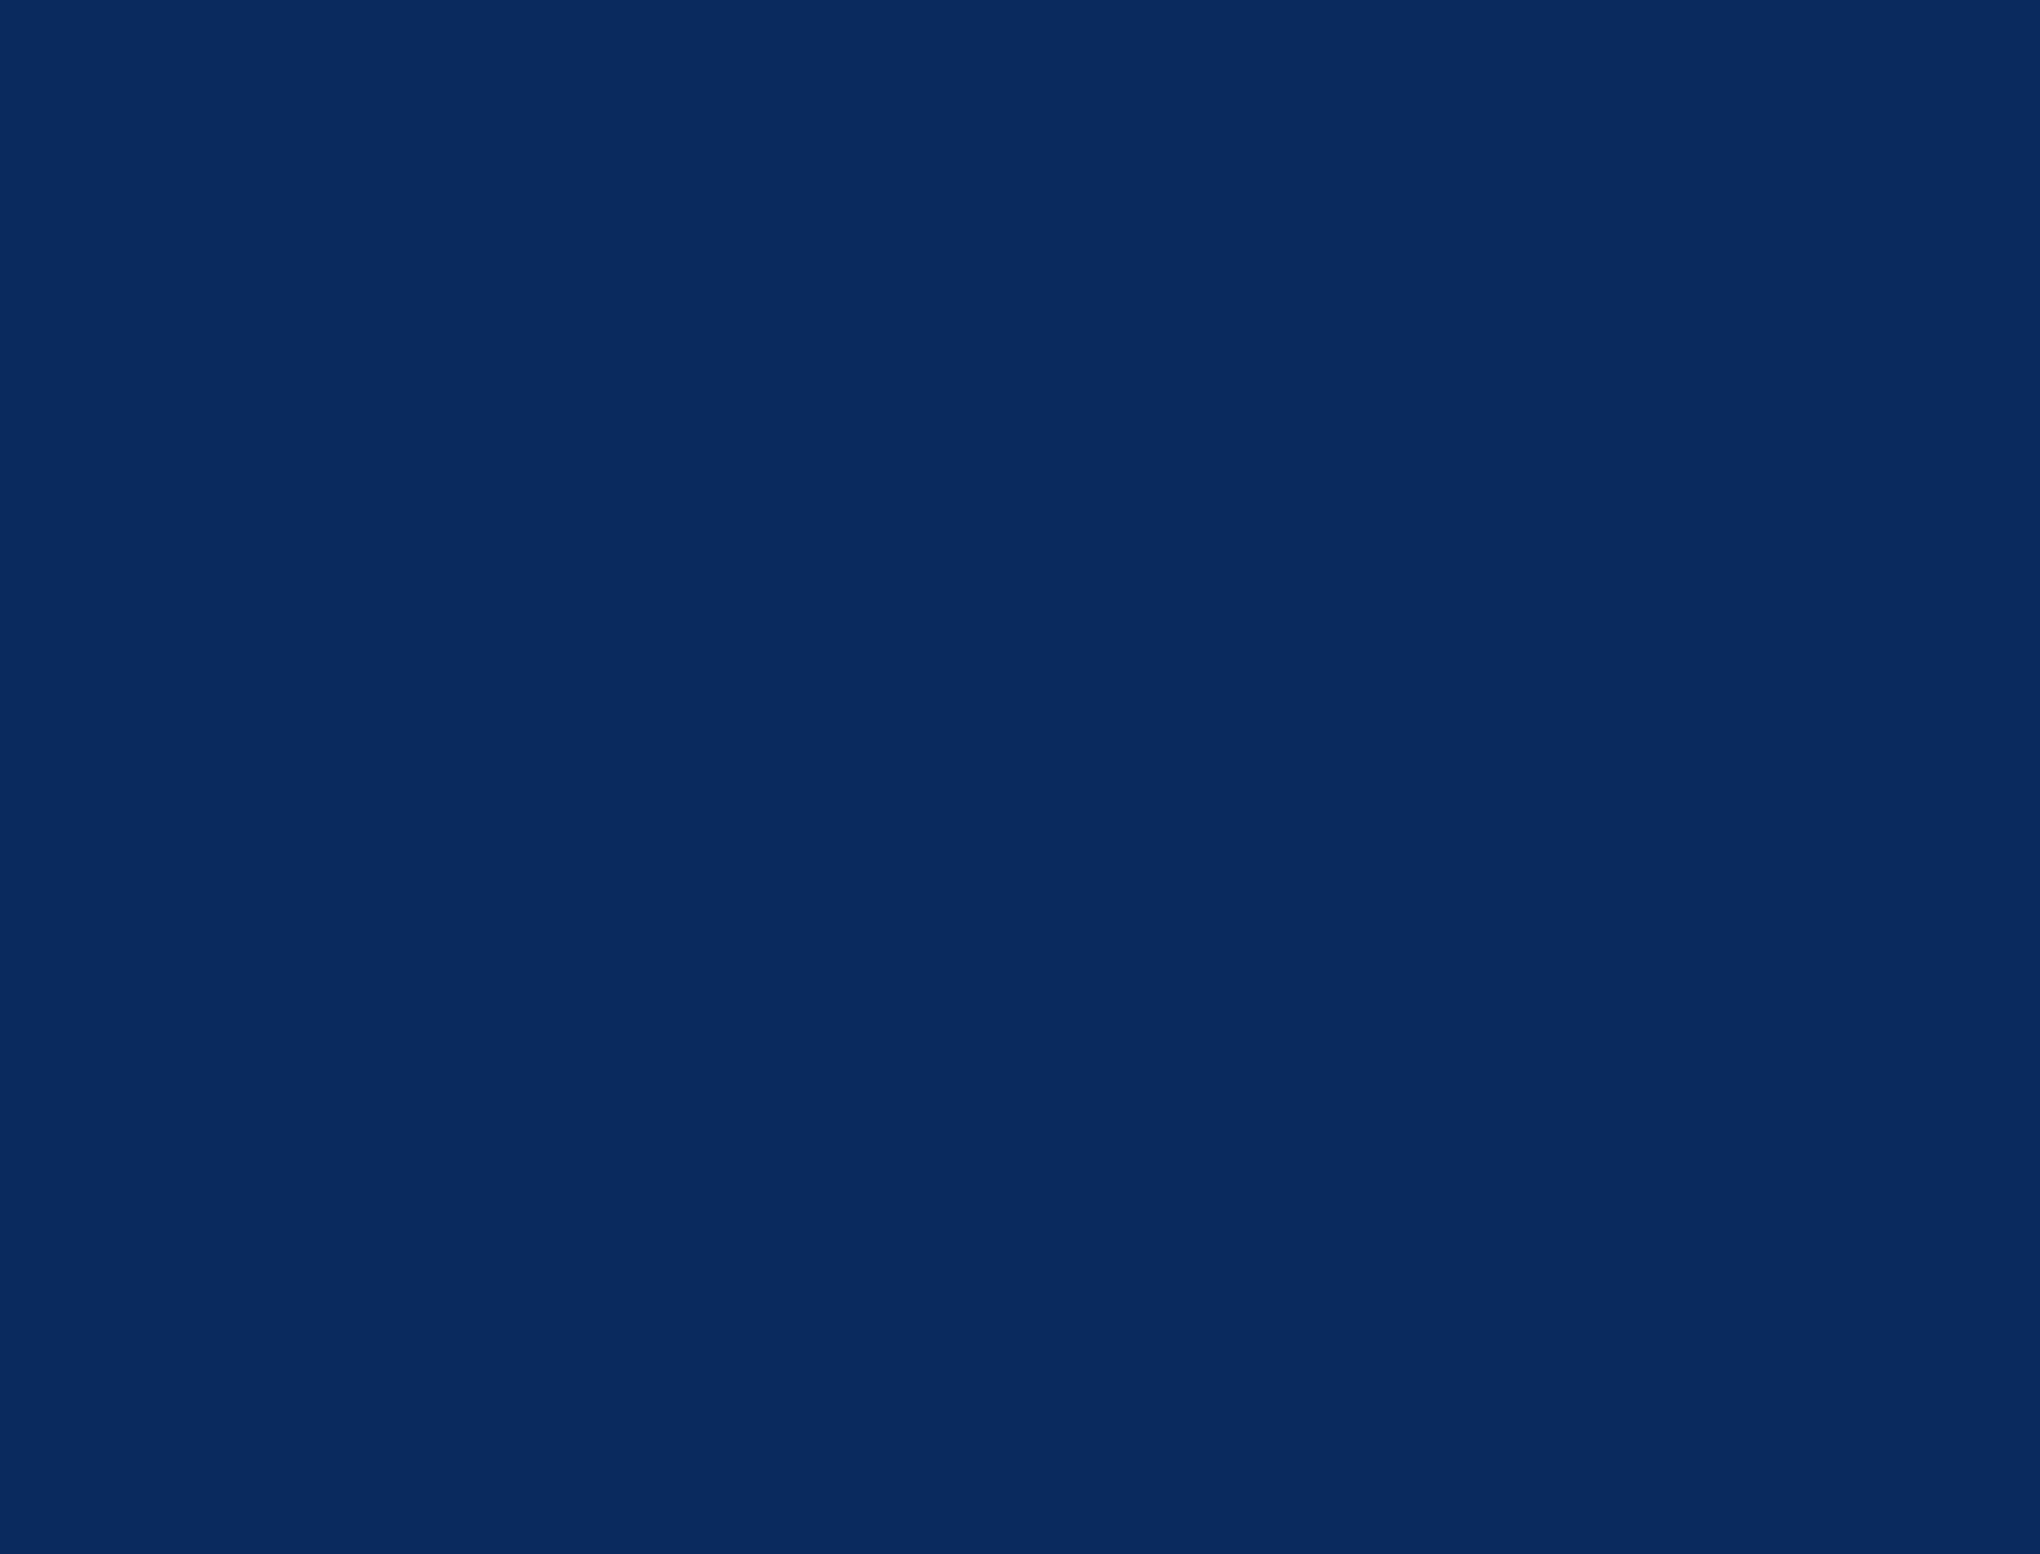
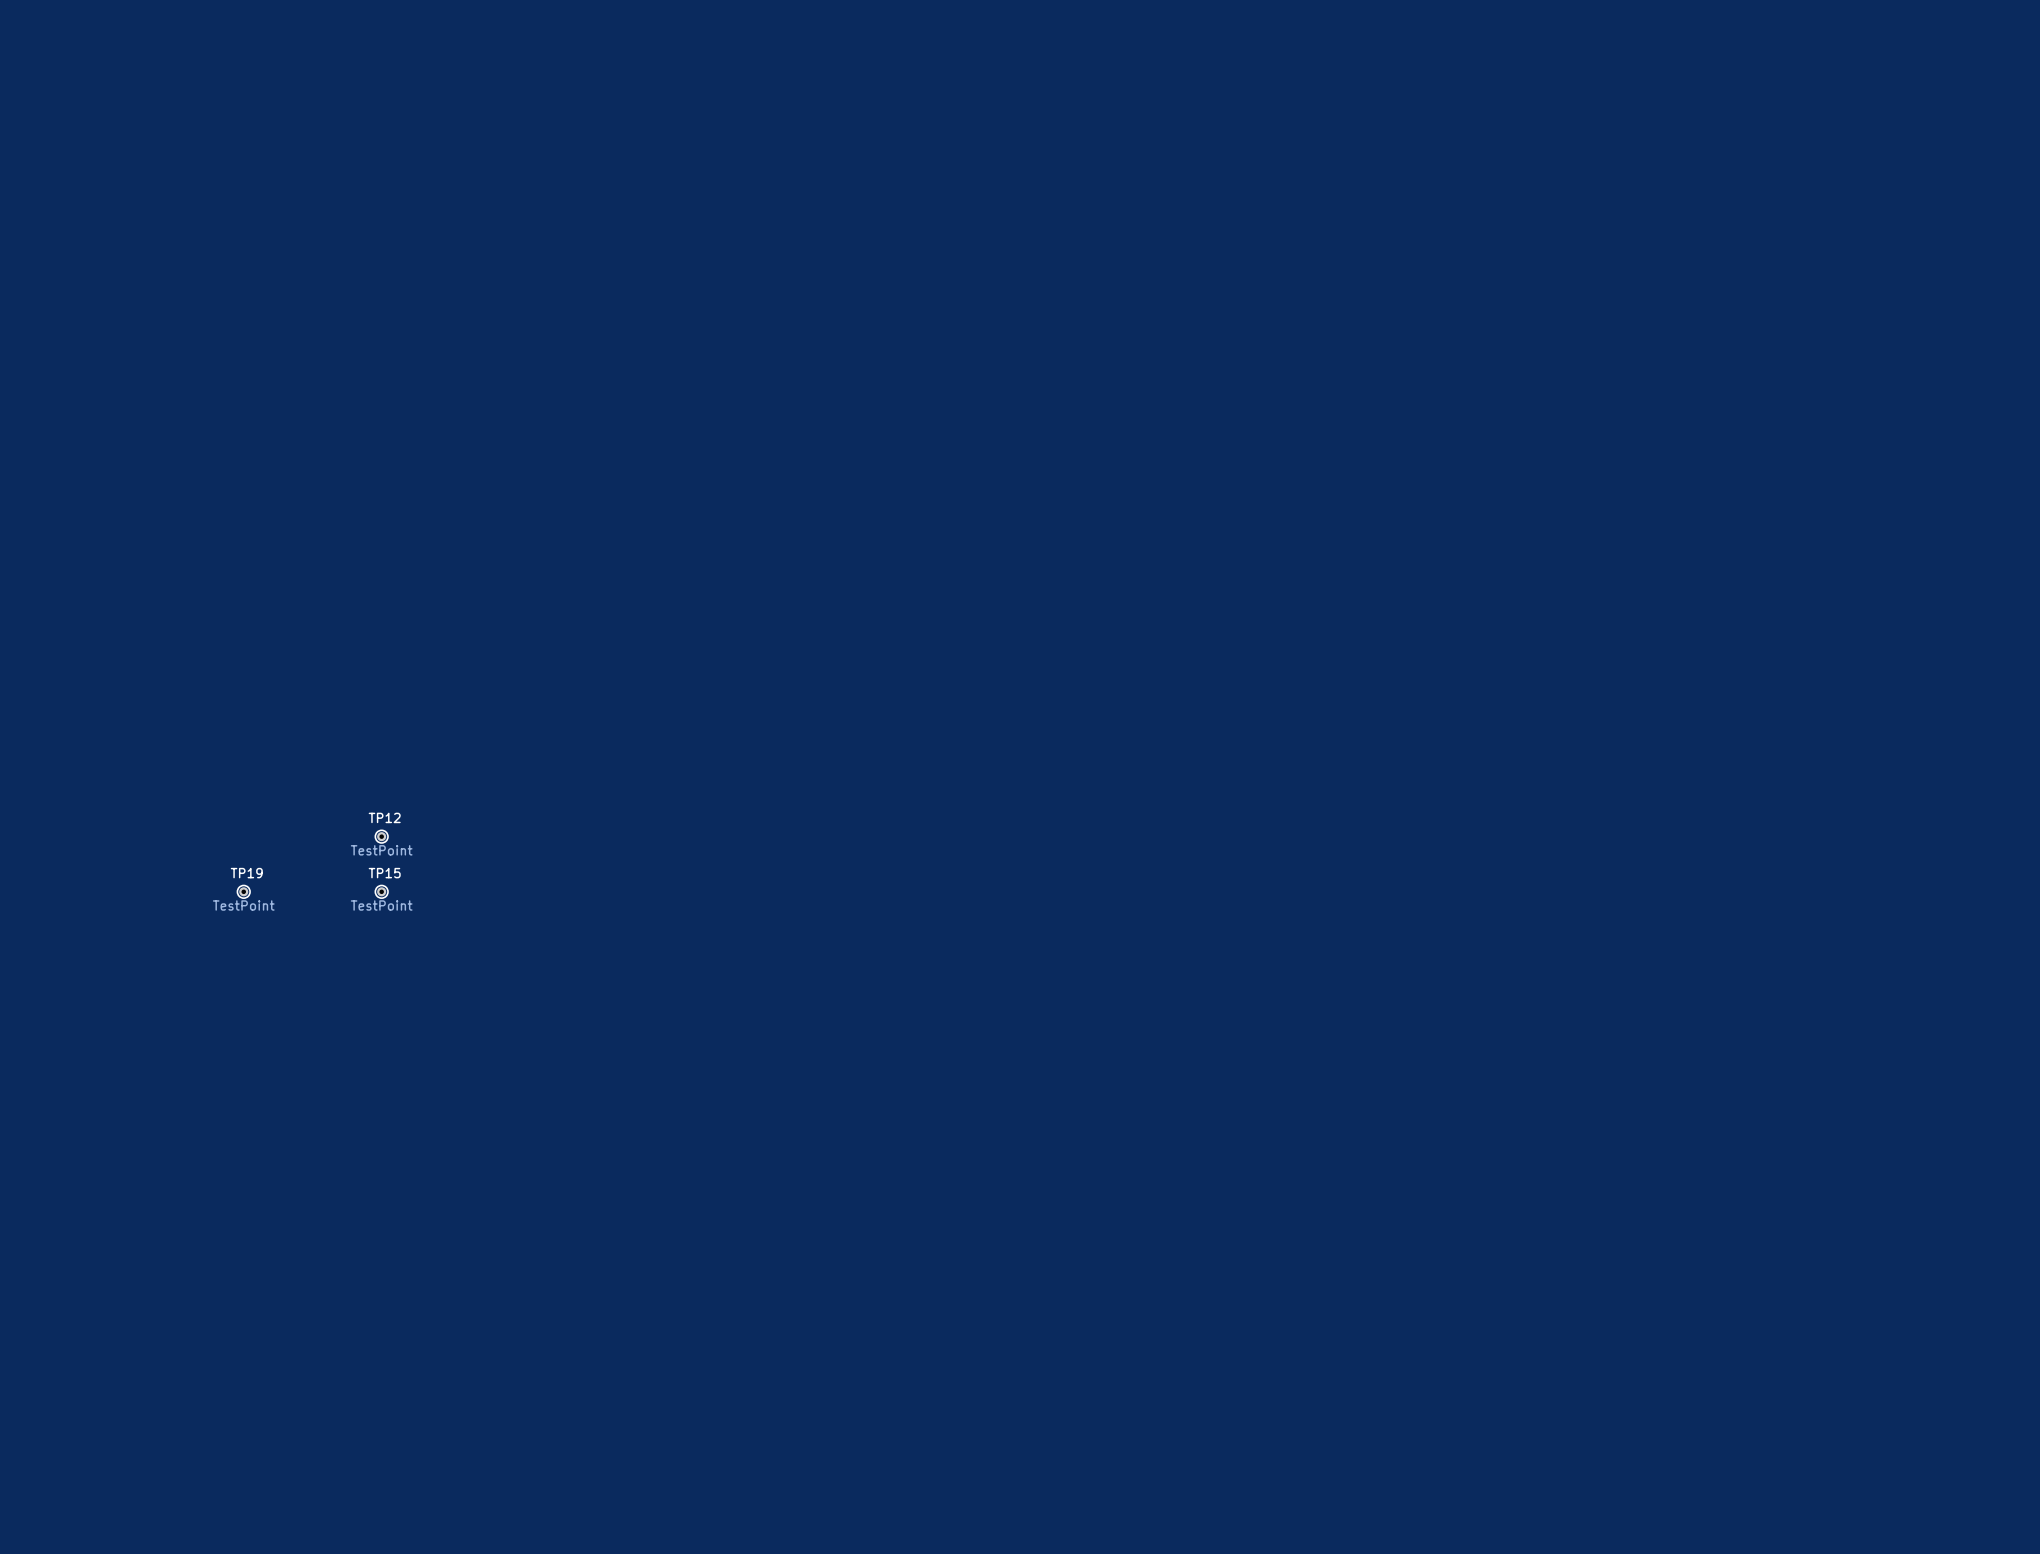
TP12: none -> TestPoint (381, 836)
TP19: none -> TestPoint (243, 891)
TP15: none -> TestPoint (381, 891)

